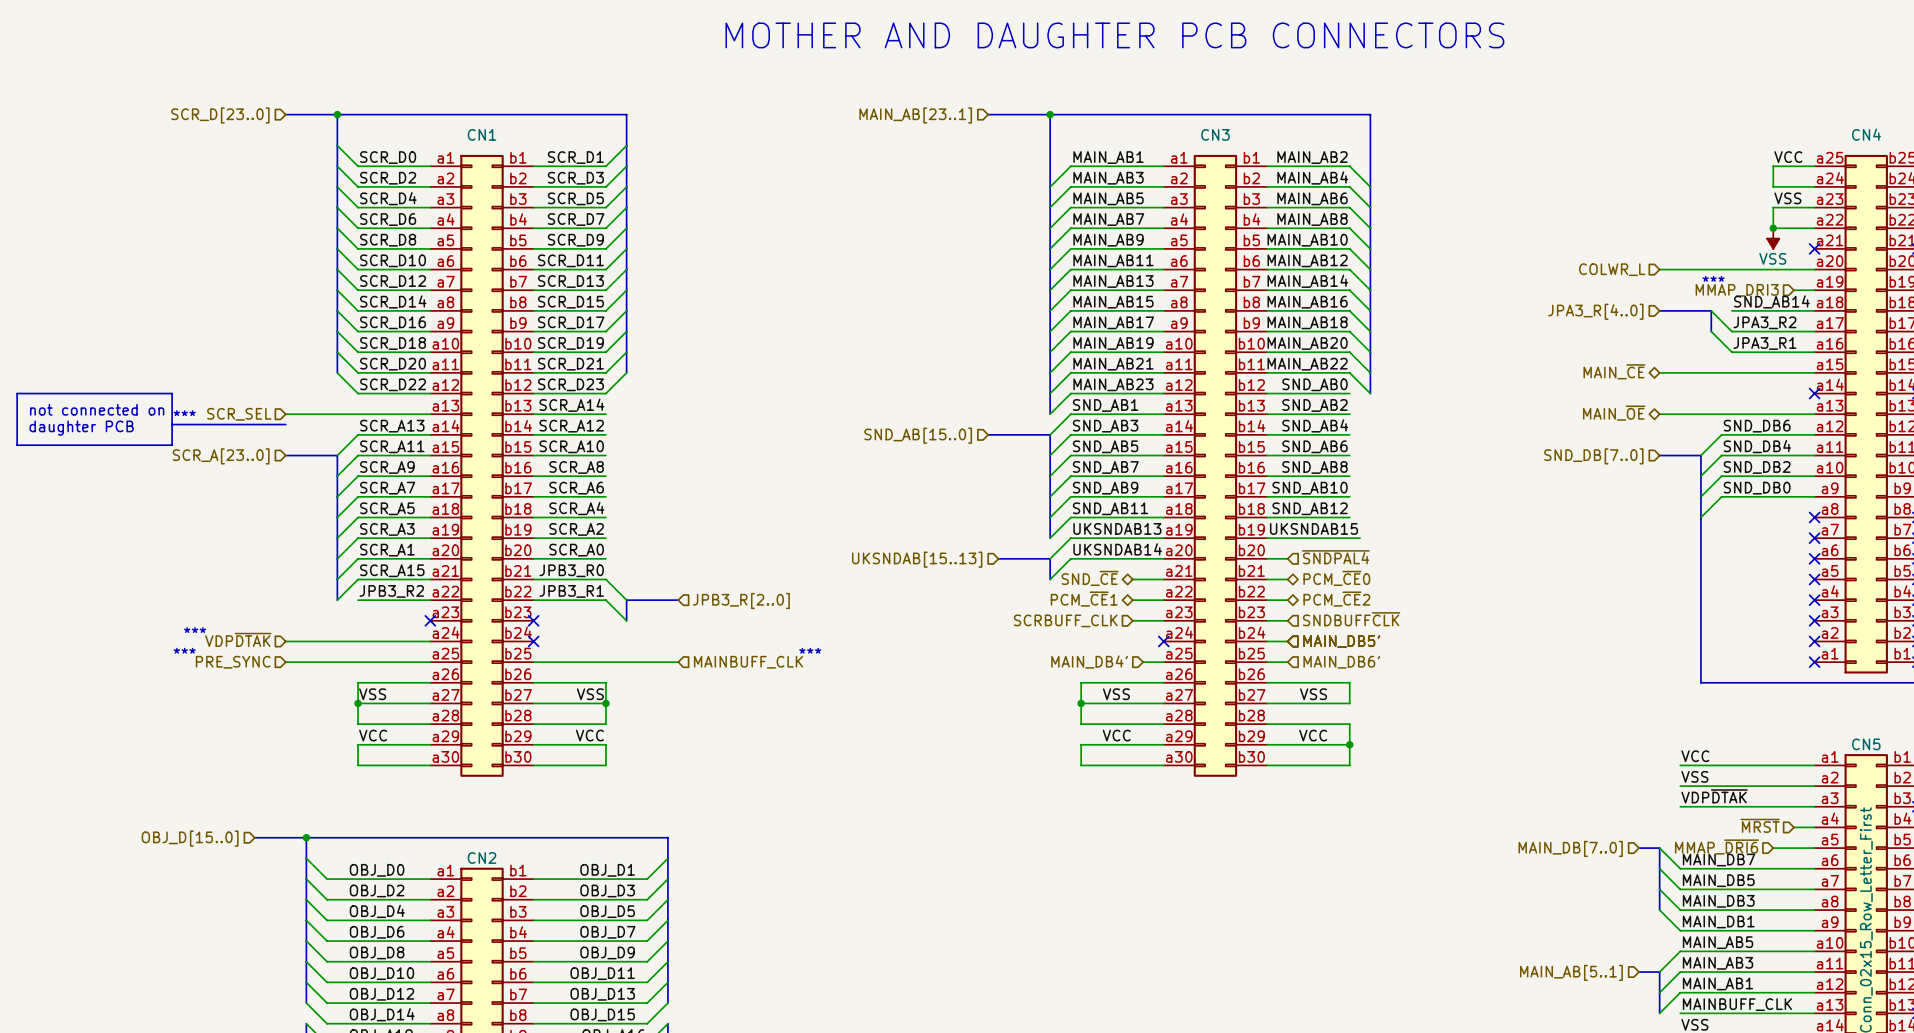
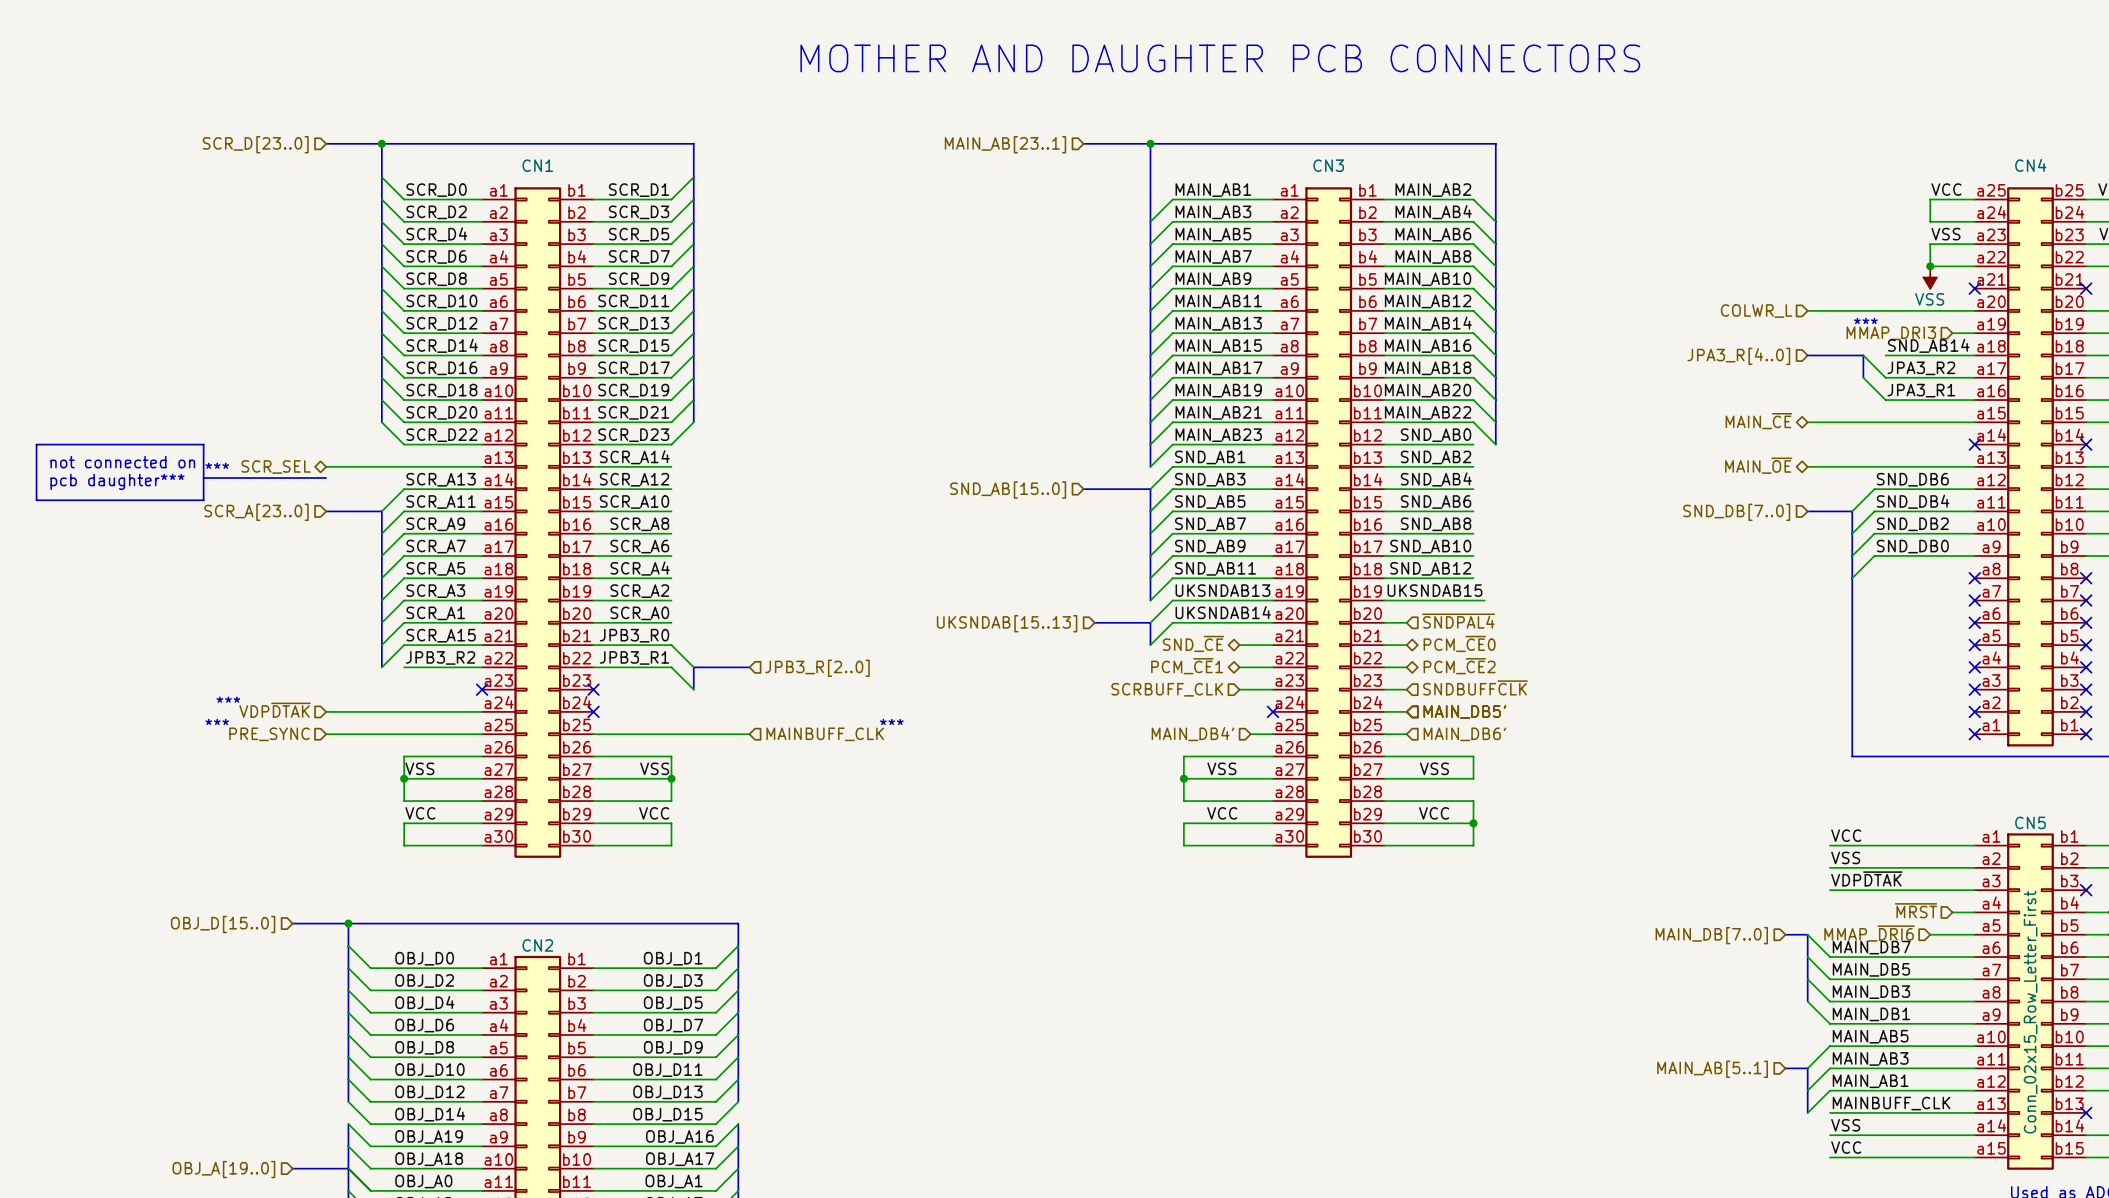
hierarchical label shape: input (239, 414) -> bidirectional (276, 466)
text: none -> *** (172, 476)
text: daughter PCB (81, 428) -> pcb daughter (105, 481)

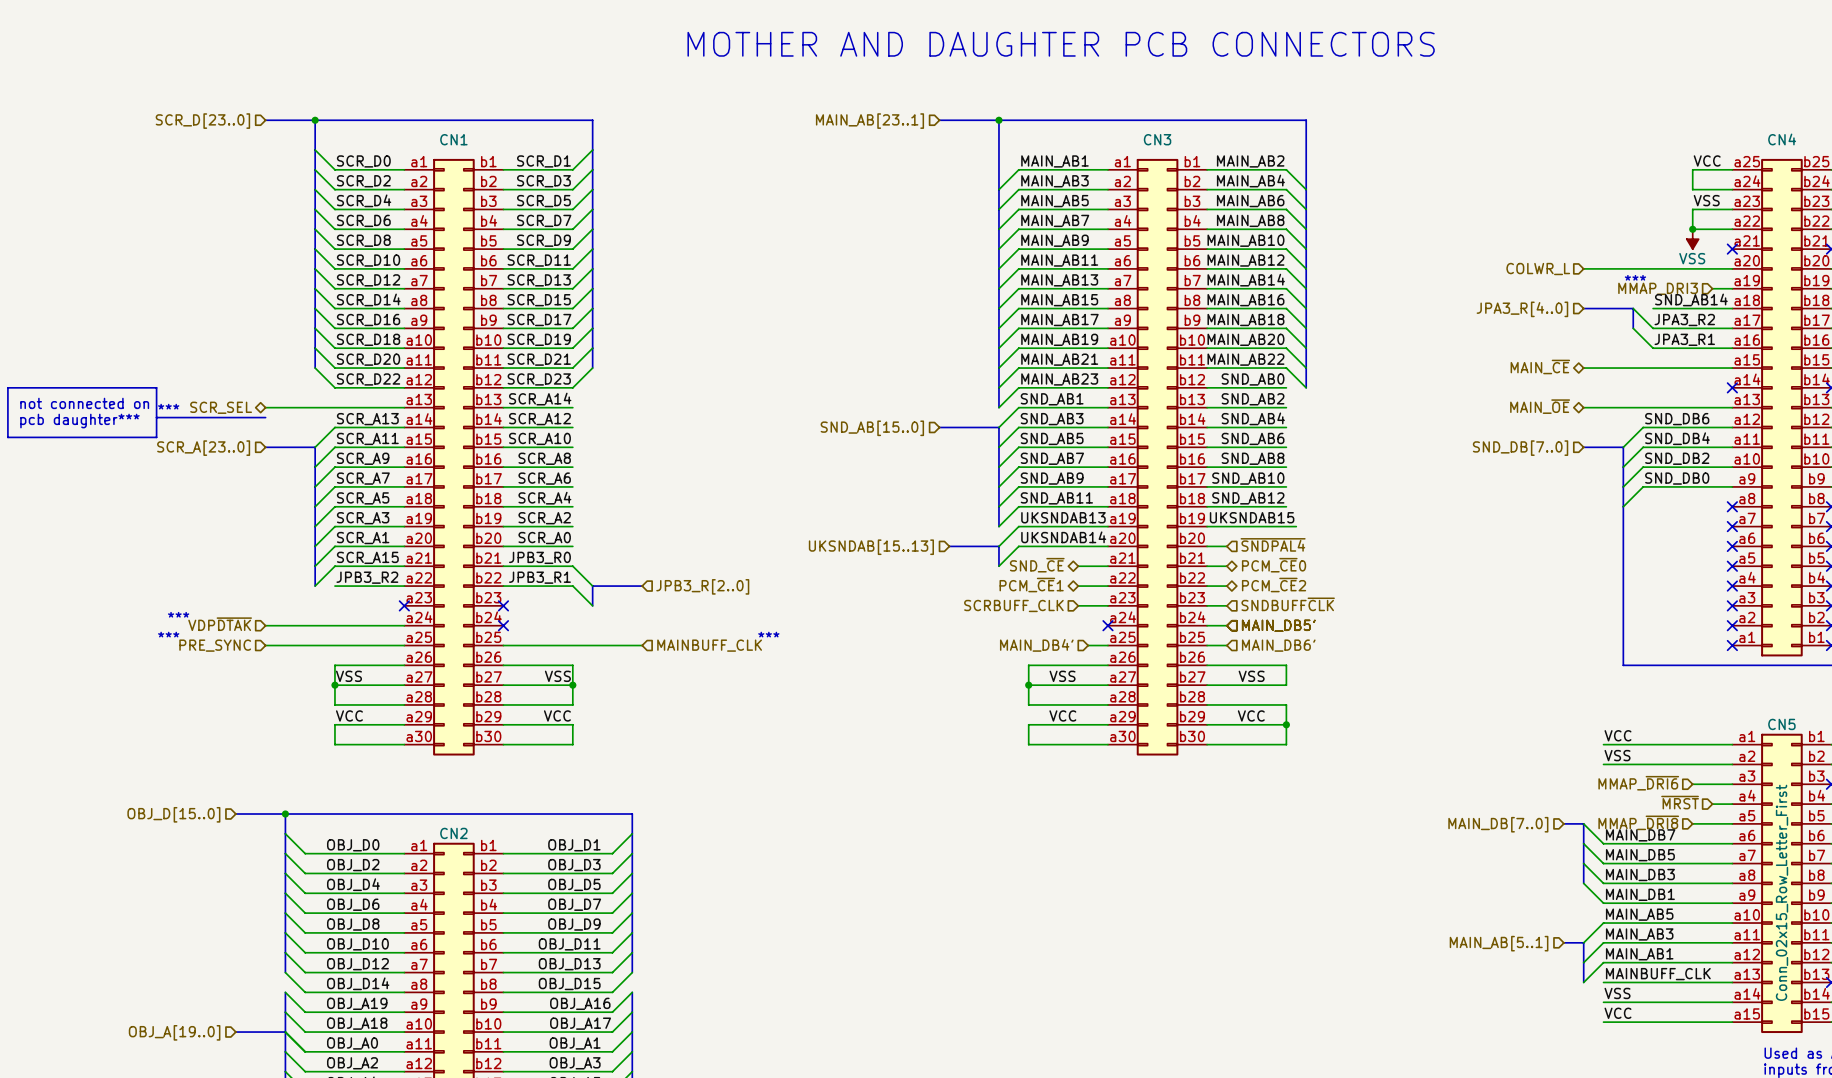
label: VDP~{DTAK} (1866, 878) -> none
hierarchical label: none -> MMAP_~{DRI6} (1638, 783)
wire: (1829, 890) (1930, 890) -> none
hierarchical label: MMAP_~{DRI6} (1869, 933) -> MMAP_~{DRI8} (1638, 822)

